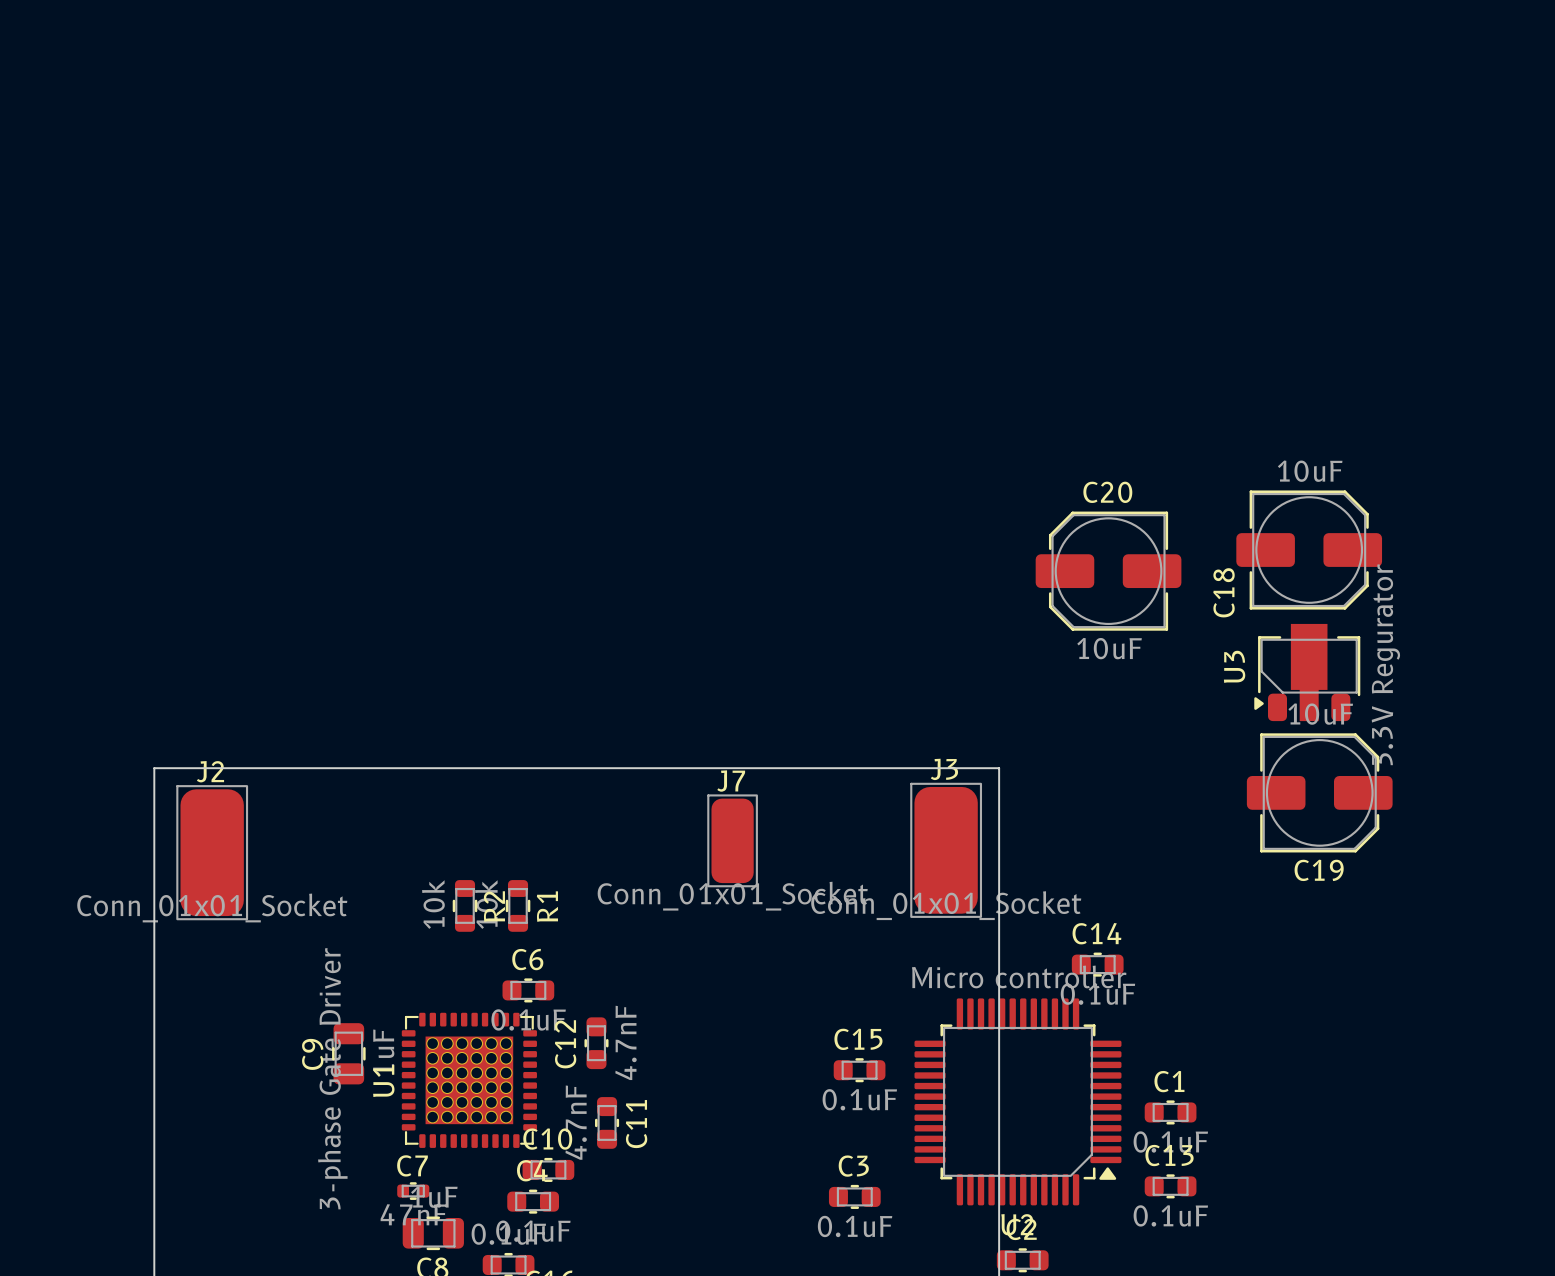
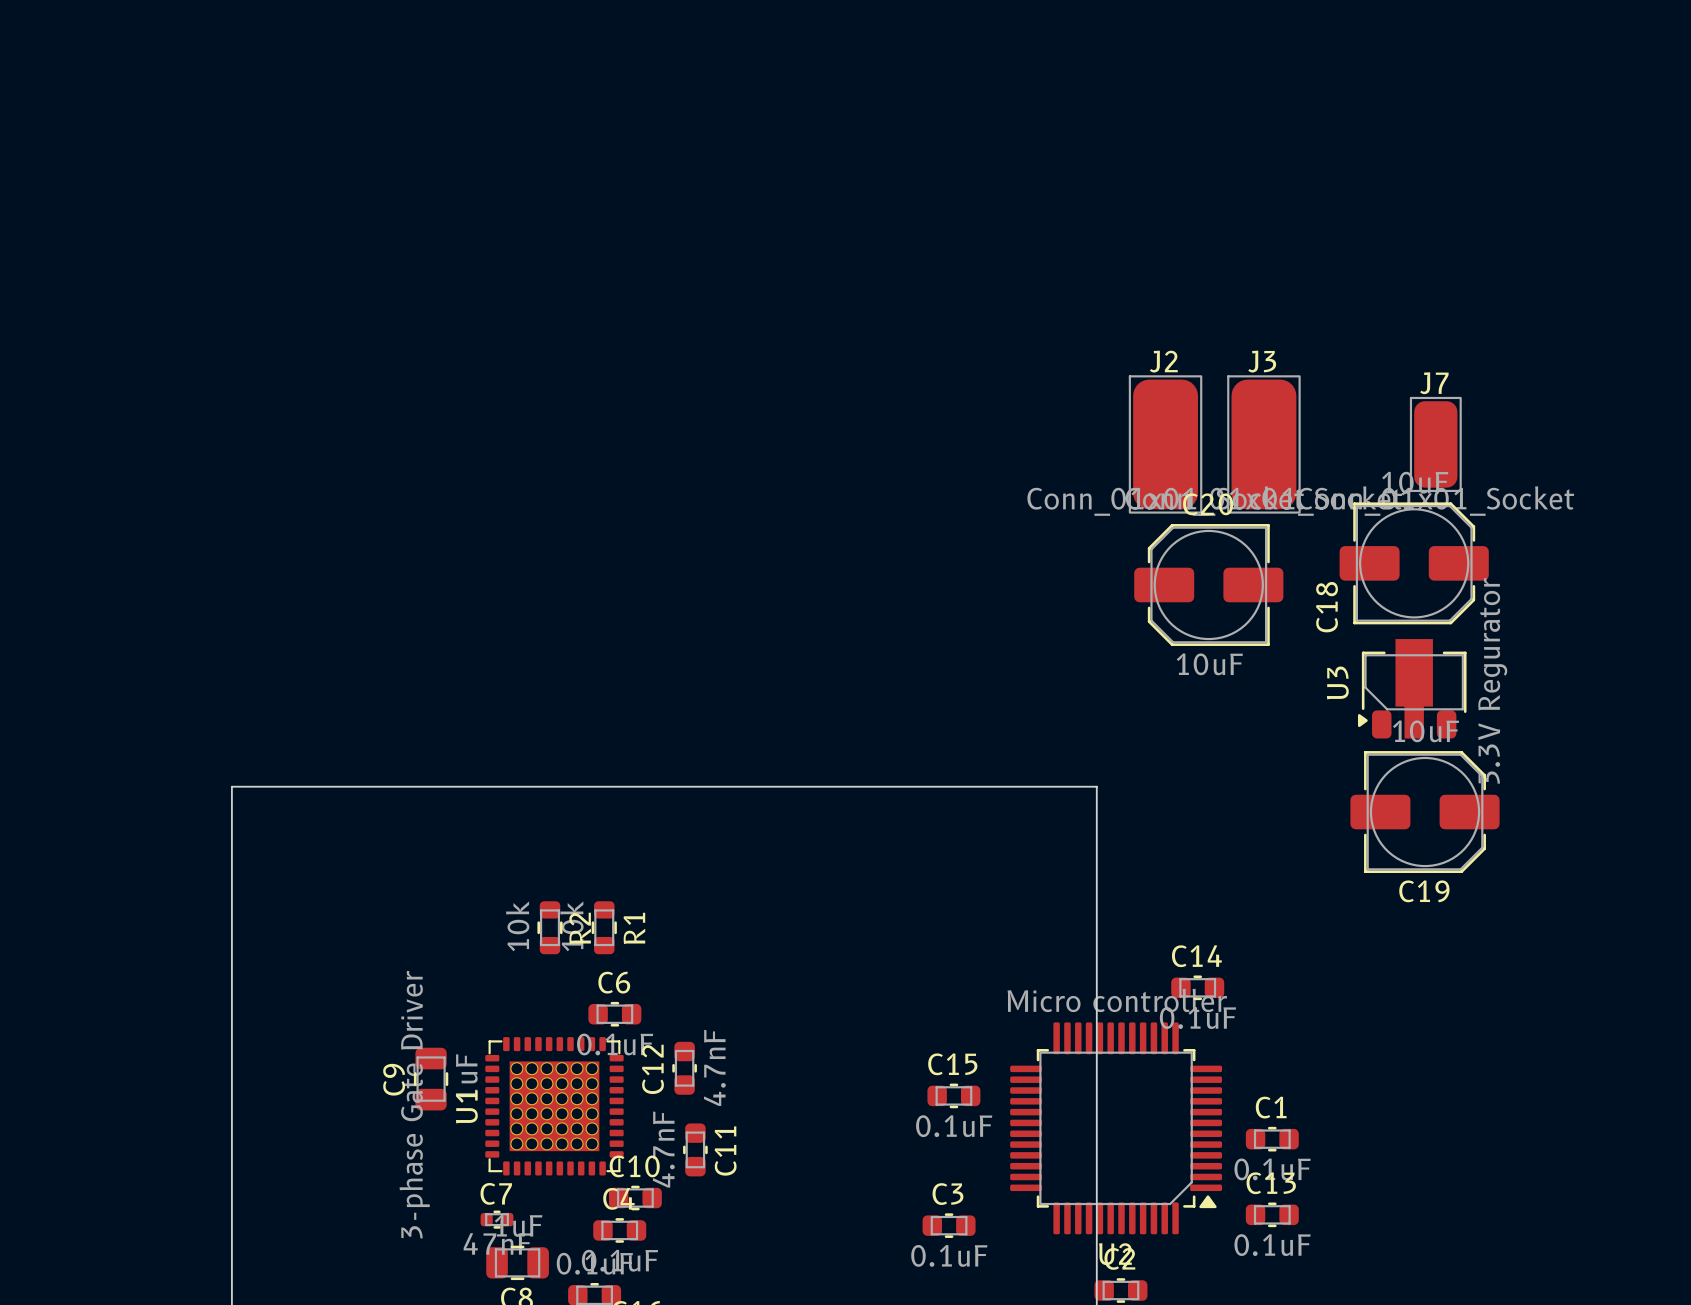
J7 position: (732, 840) -> (1435, 444)
J3 position: (946, 850) -> (1263, 444)
J2 position: (212, 852) -> (1165, 444)

